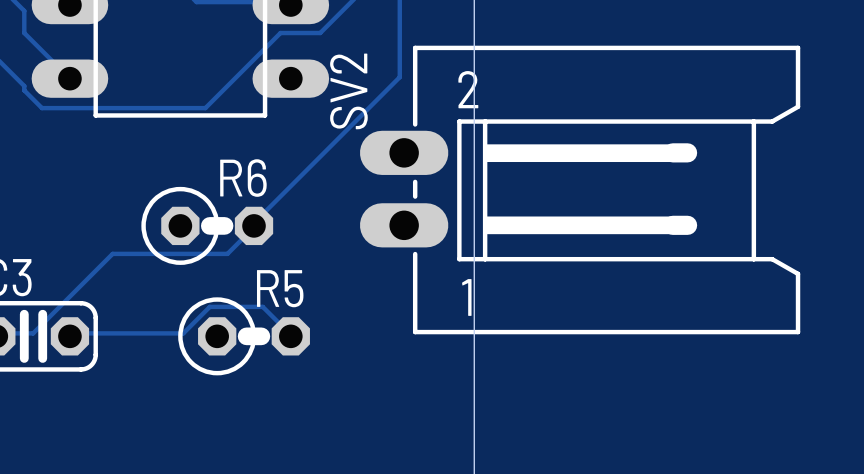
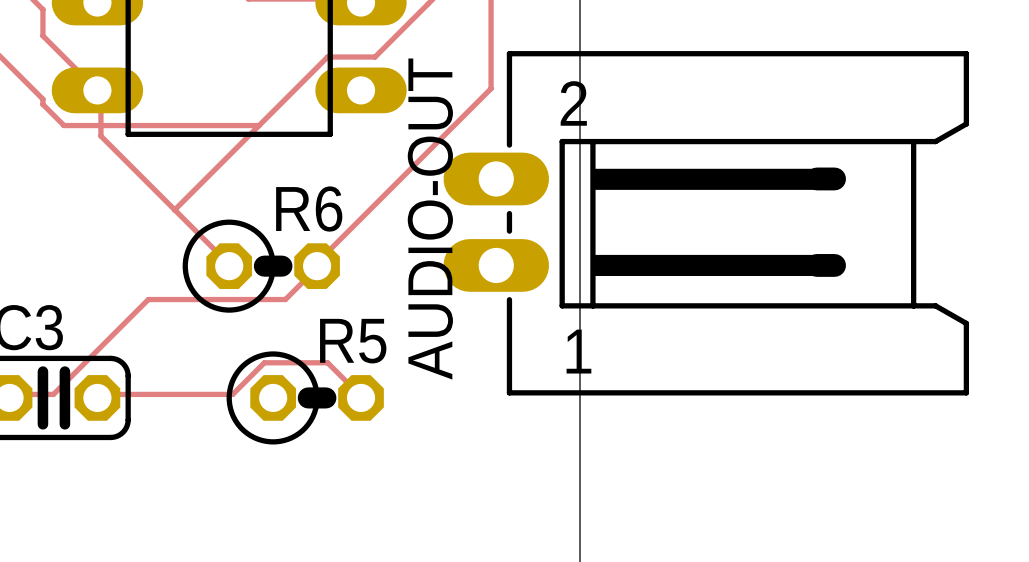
track: (320, 33) (280, 33) (262, 50) -> (396, 35) (375, 57) (327, 57)
track: none -> (97, 90) (100, 93) (100, 136) (229, 266)
SV2 name: SV2 (348, 91) -> AUDIO-OUT (430, 219)
track: none -> (259, 125) (174, 209)

